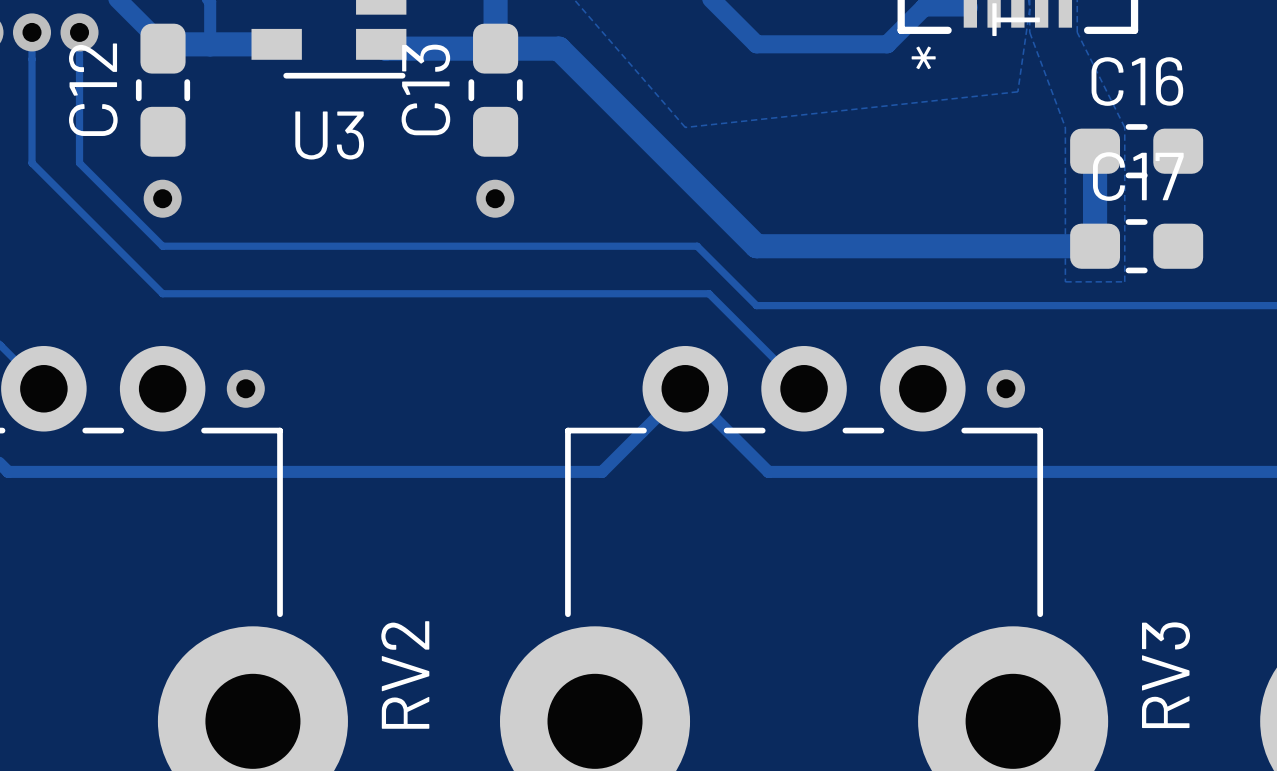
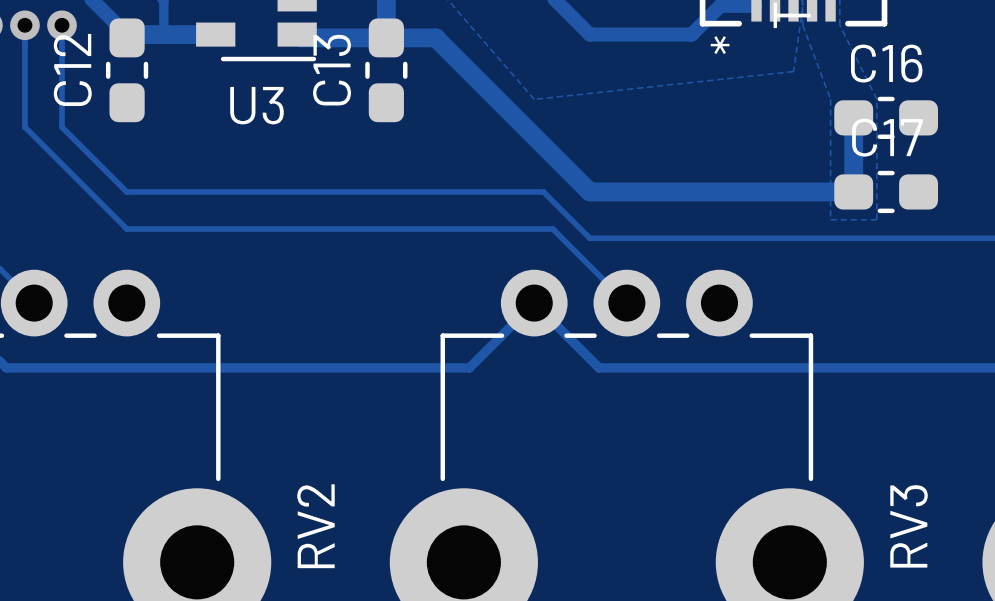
via: (162, 198) -> none
via: (495, 198) -> none
via: (245, 388) -> none
via: (1005, 388) -> none

